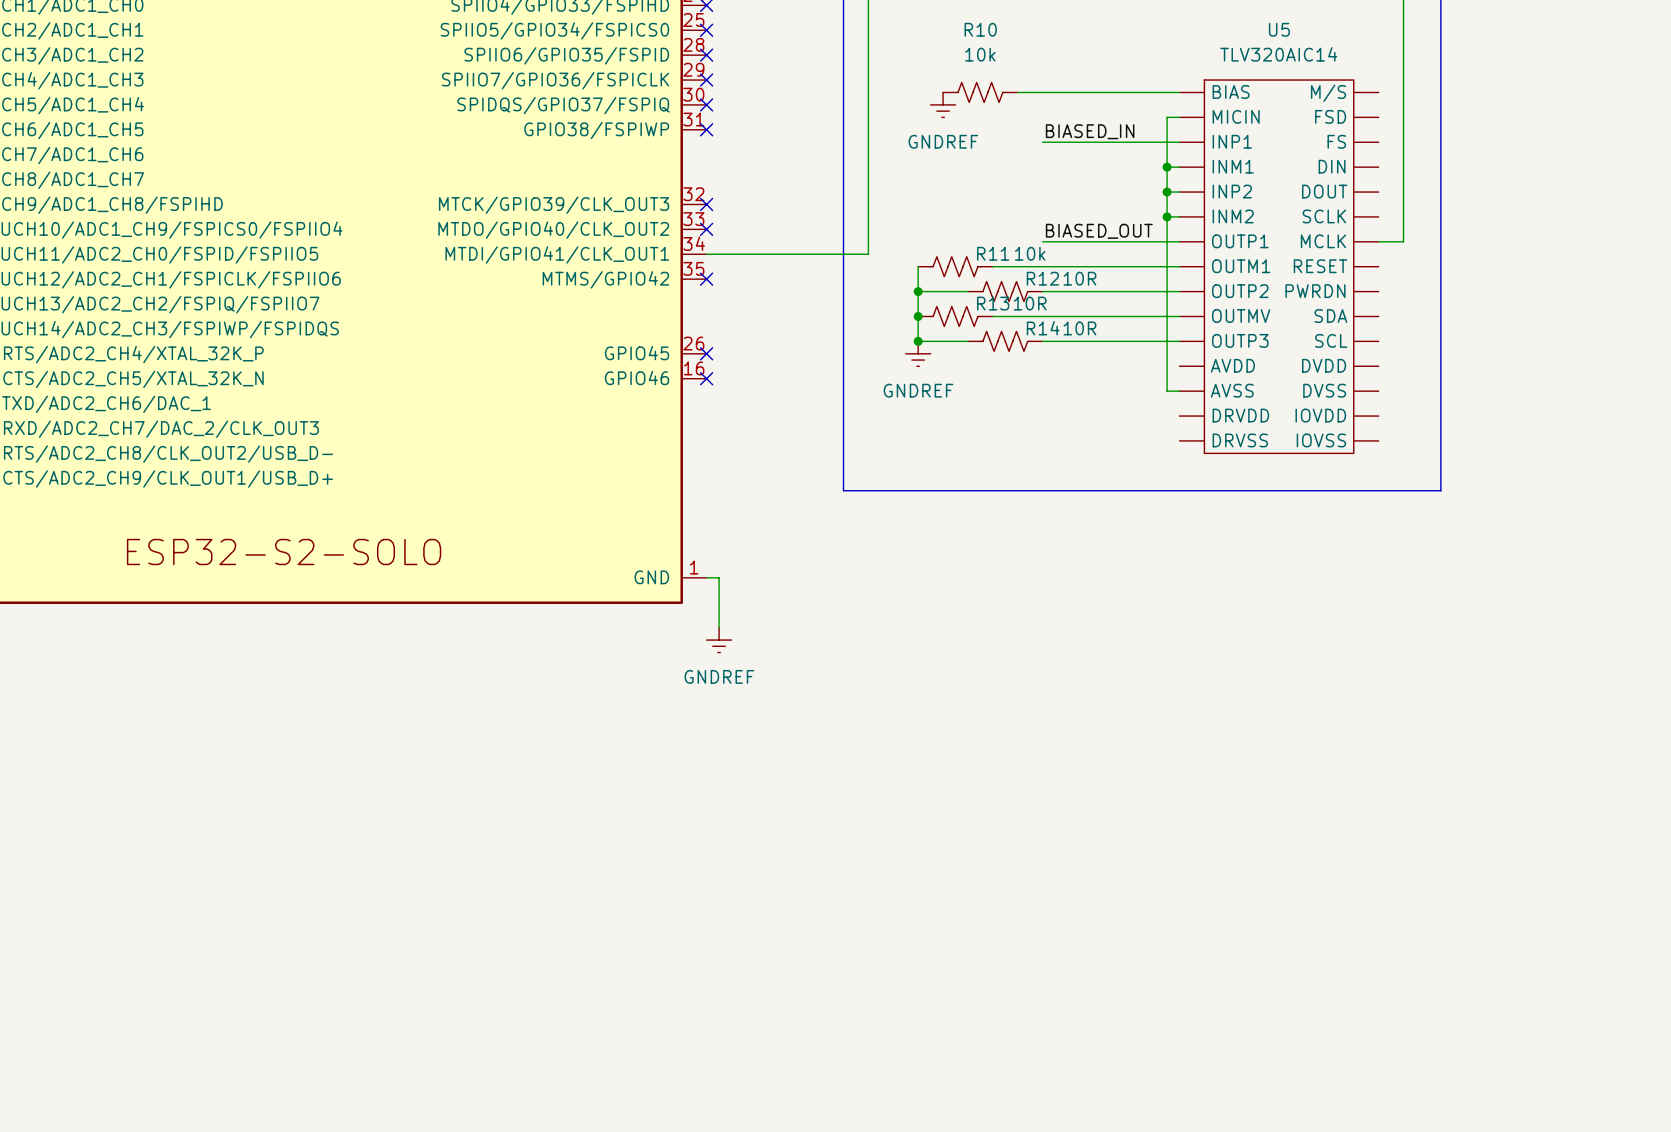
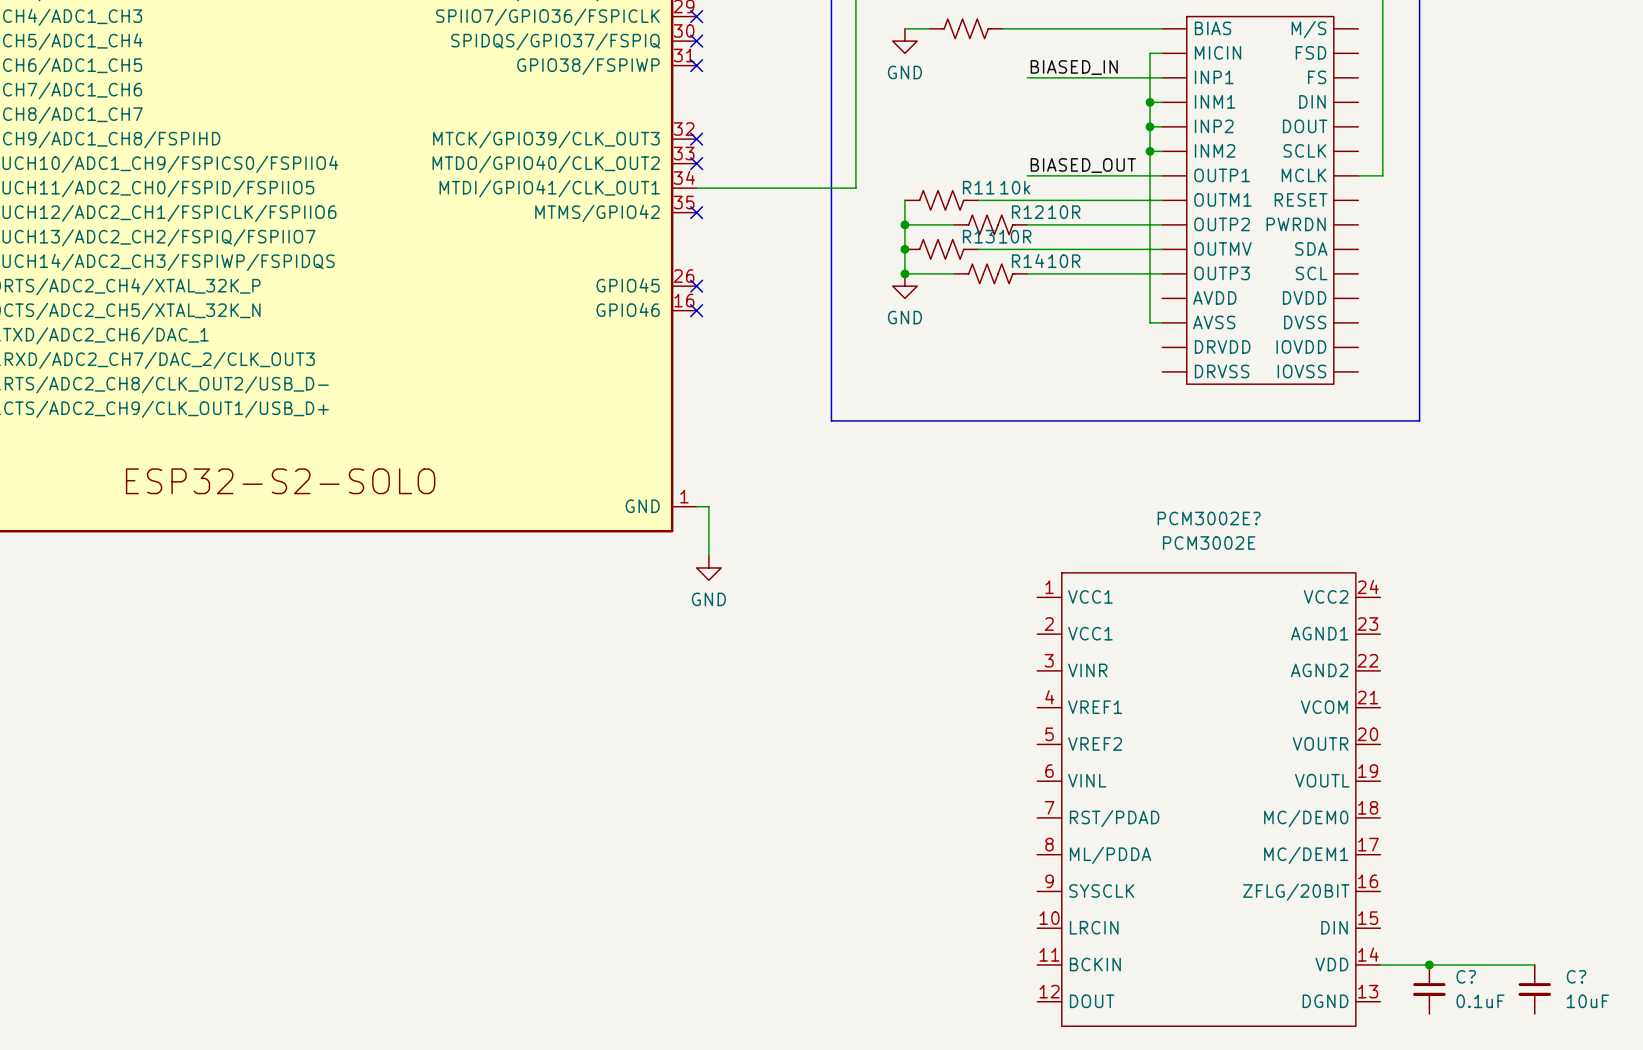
wire: none -> (904, 28) (929, 28)
power symbol: none -> GND (904, 41)
power symbol: GNDREF (943, 104) -> none
power symbol: GNDREF (918, 353) -> GND (904, 286)
power symbol: GNDREF (719, 640) -> GND (708, 567)
PCM3002E?: none -> PCM3002E (1208, 799)
wire: none -> (1380, 964) (1534, 964)
junction: none -> (1429, 964)
C?: none -> 0.1uF (1429, 989)
C?: none -> 10uF (1534, 989)

